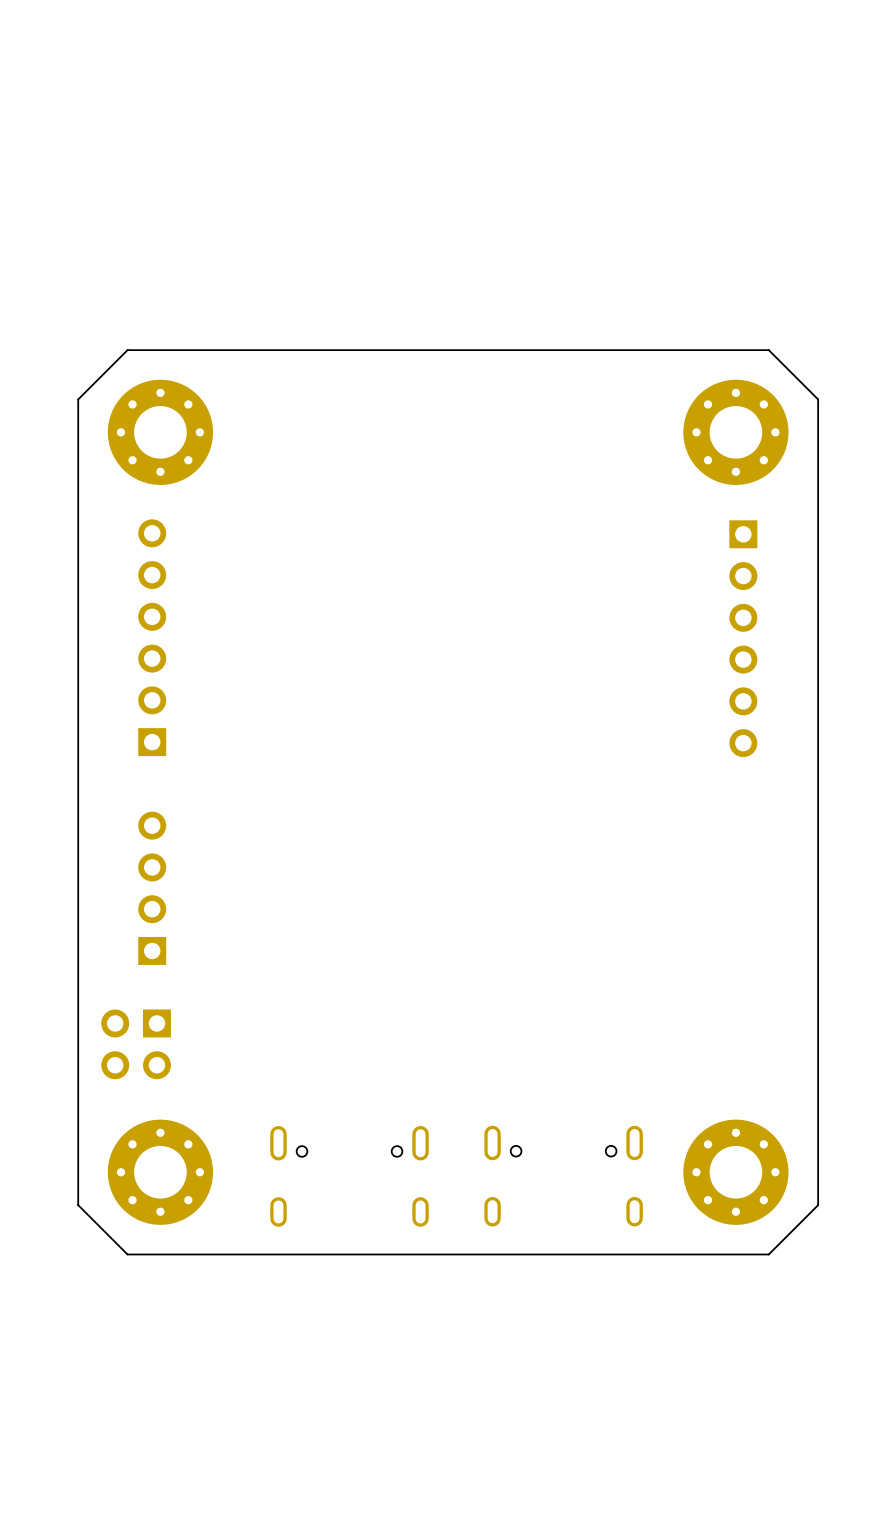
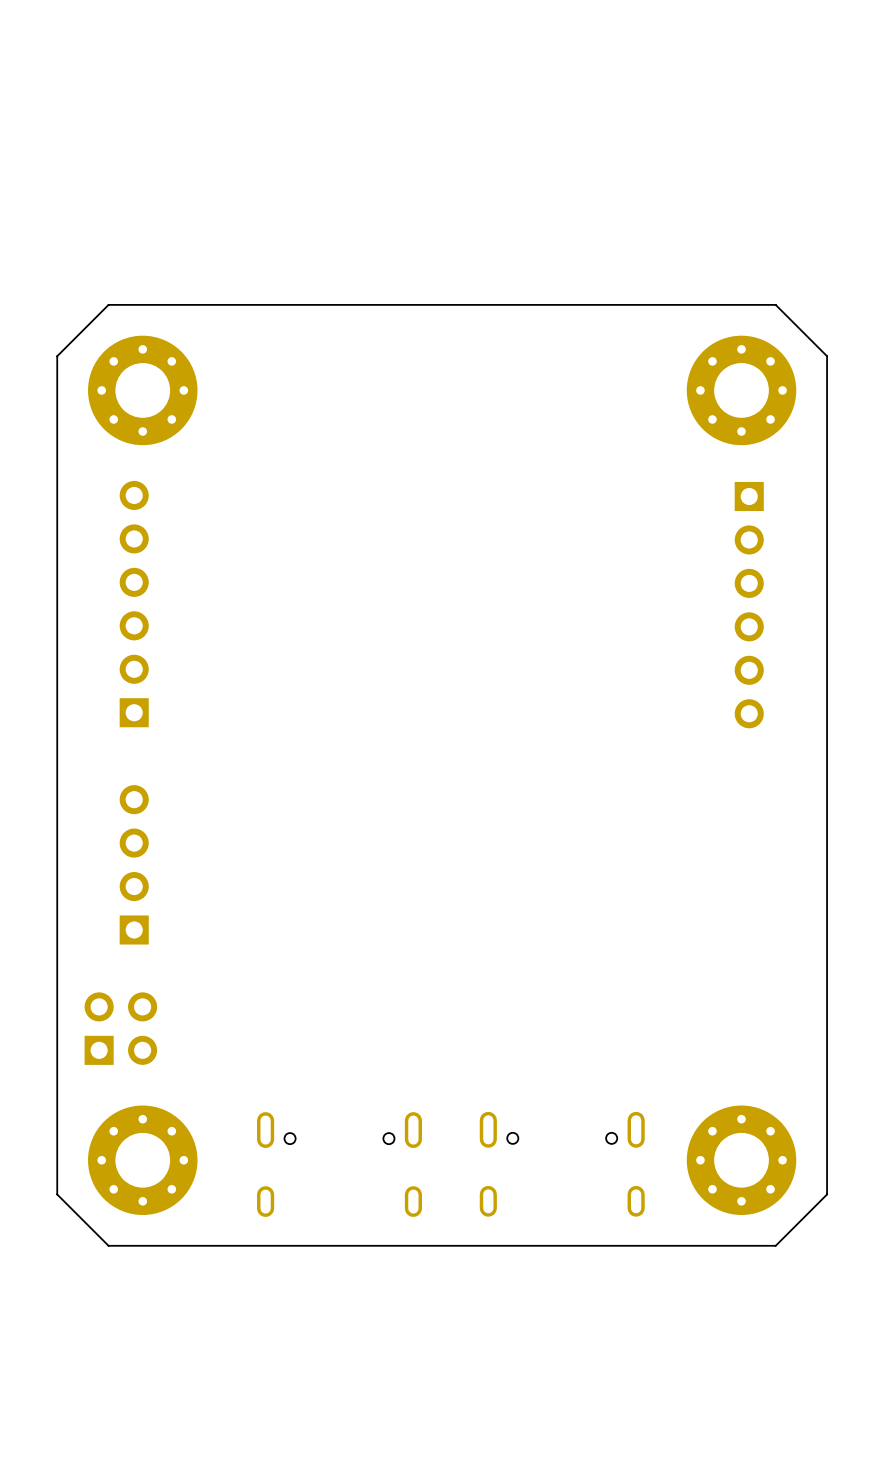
part rotation: 0° (136, 1044) -> 180° (120, 1028)

